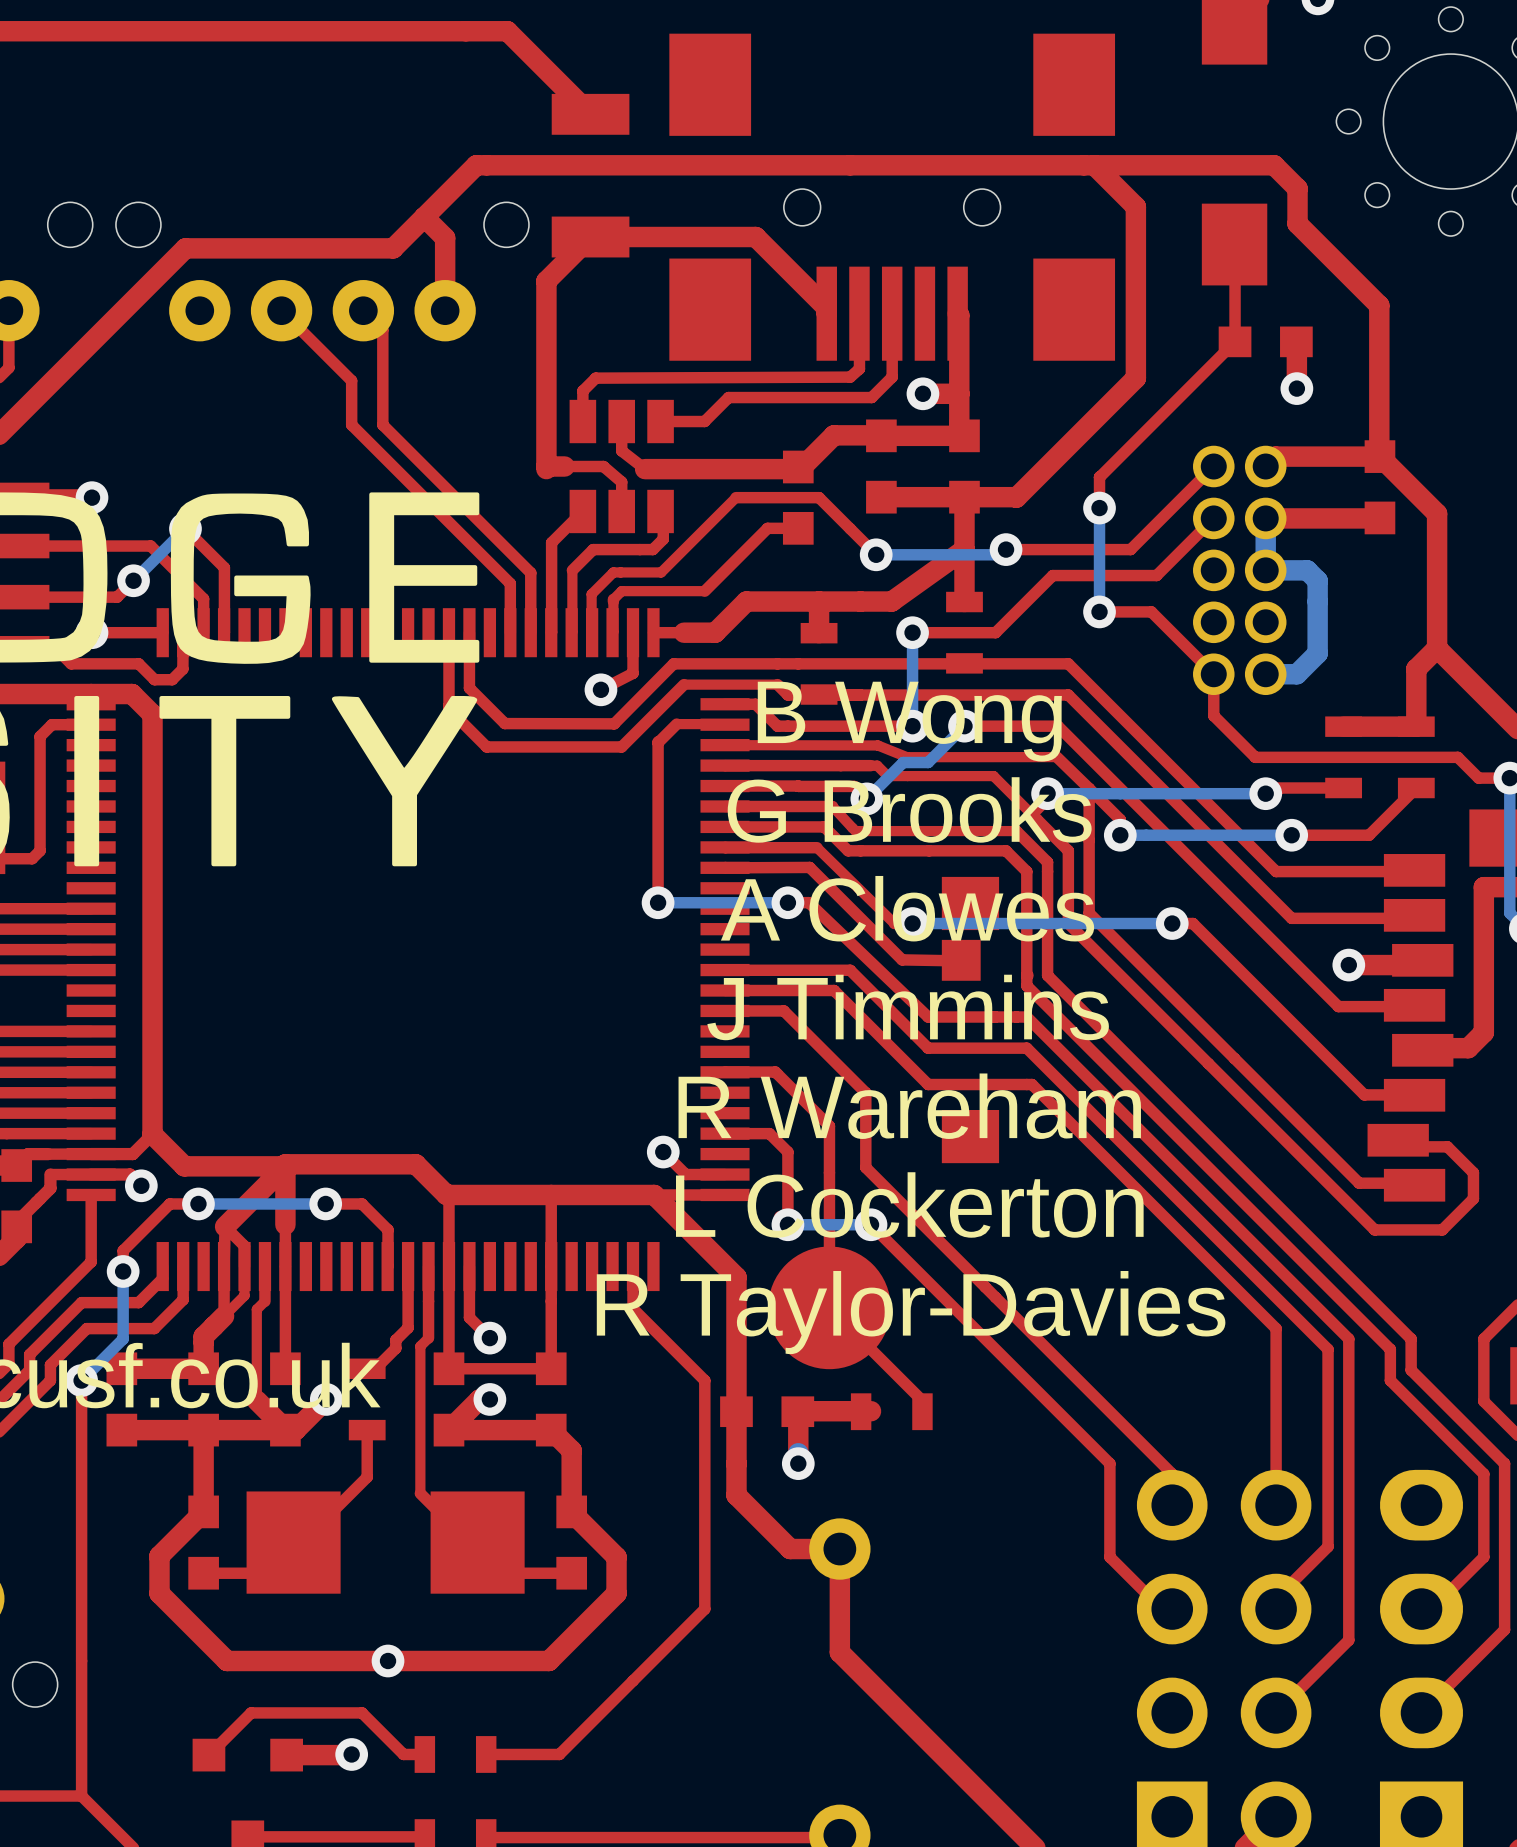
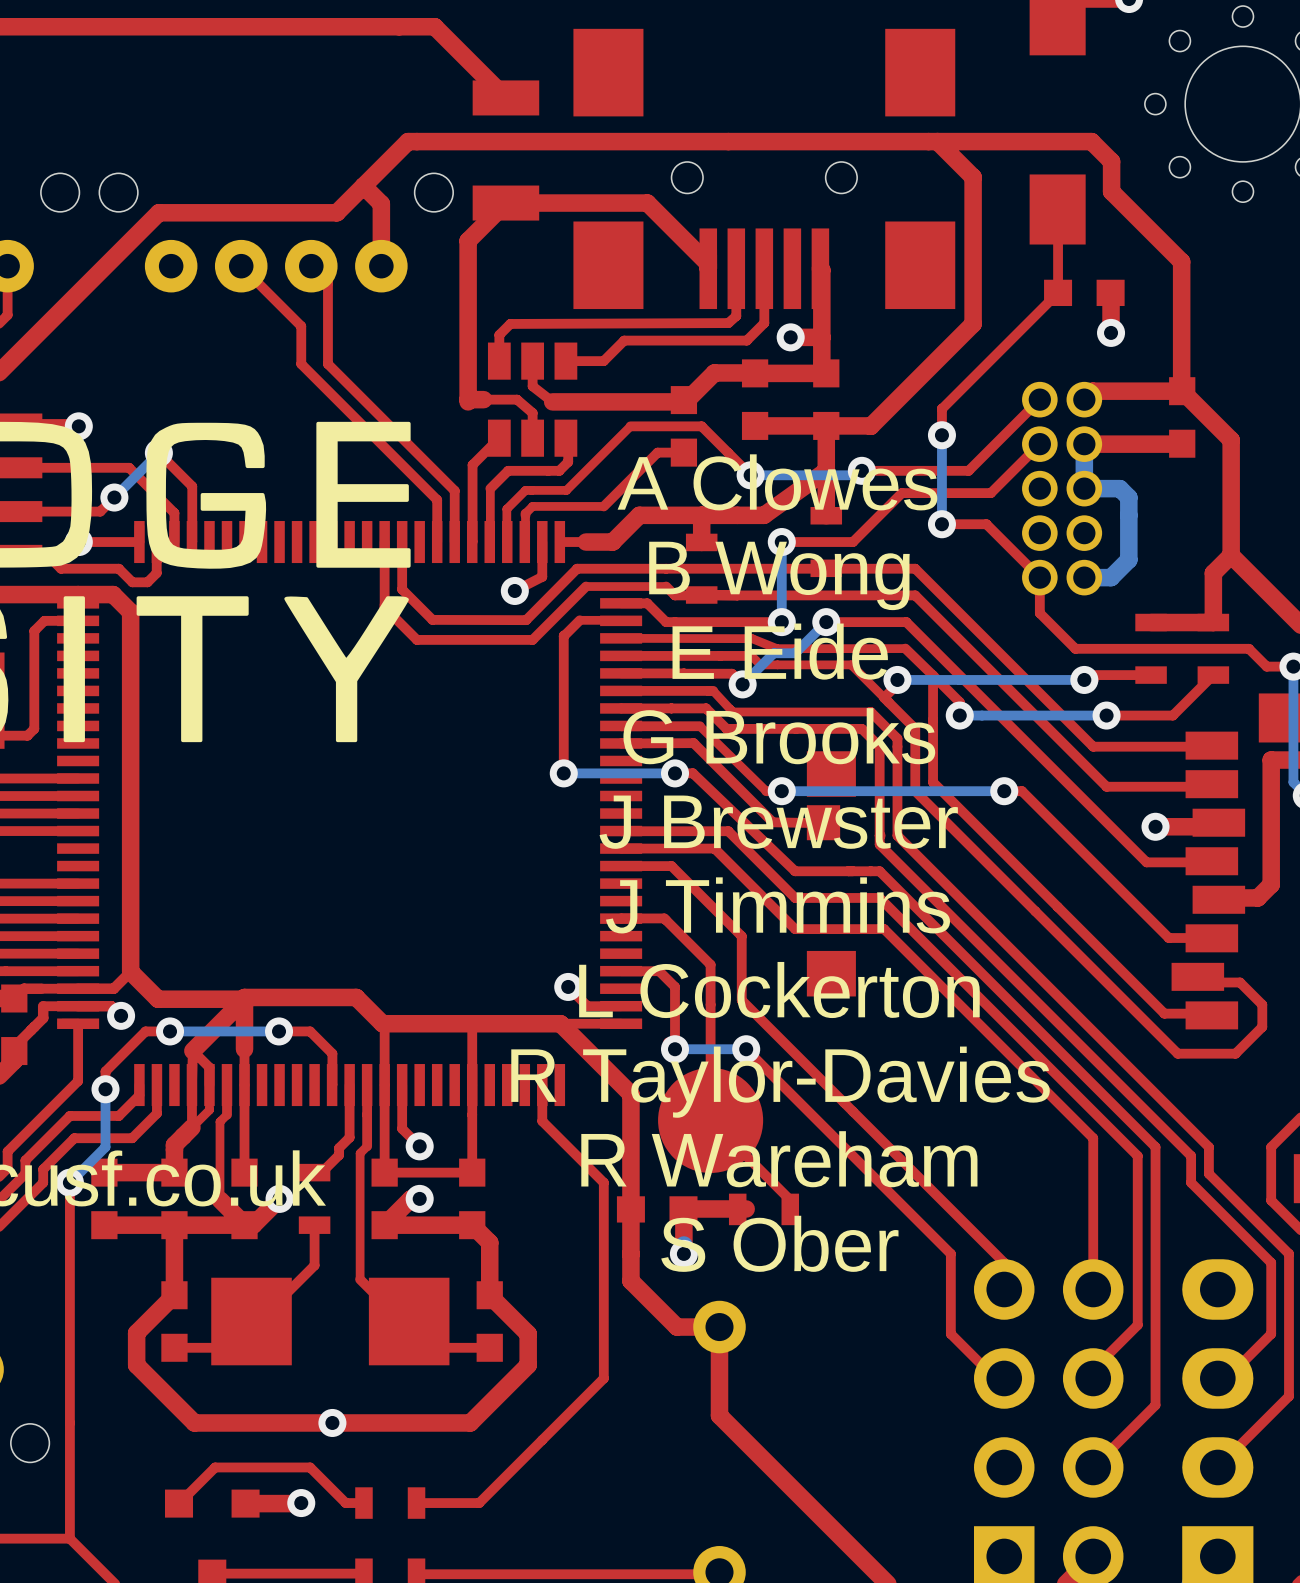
text position: B Wong (909, 721) -> B Wong (779, 575)
text: none -> E Eide (780, 651)
text position: G Brooks (909, 809) -> G Brooks (779, 736)
text position: A Clowes (907, 908) -> A Clowes (777, 482)
text: none -> J Brewster (778, 822)
text position: J Timmins (908, 1007) -> J Timmins (777, 905)
text position: R Wareham (909, 1106) -> R Wareham (779, 1159)
text position: L Cockerton (909, 1204) -> L Cockerton (779, 990)
text position: R Taylor-Davies (911, 1312) -> R Taylor-Davies (780, 1082)
text: none -> S Ober (779, 1243)

